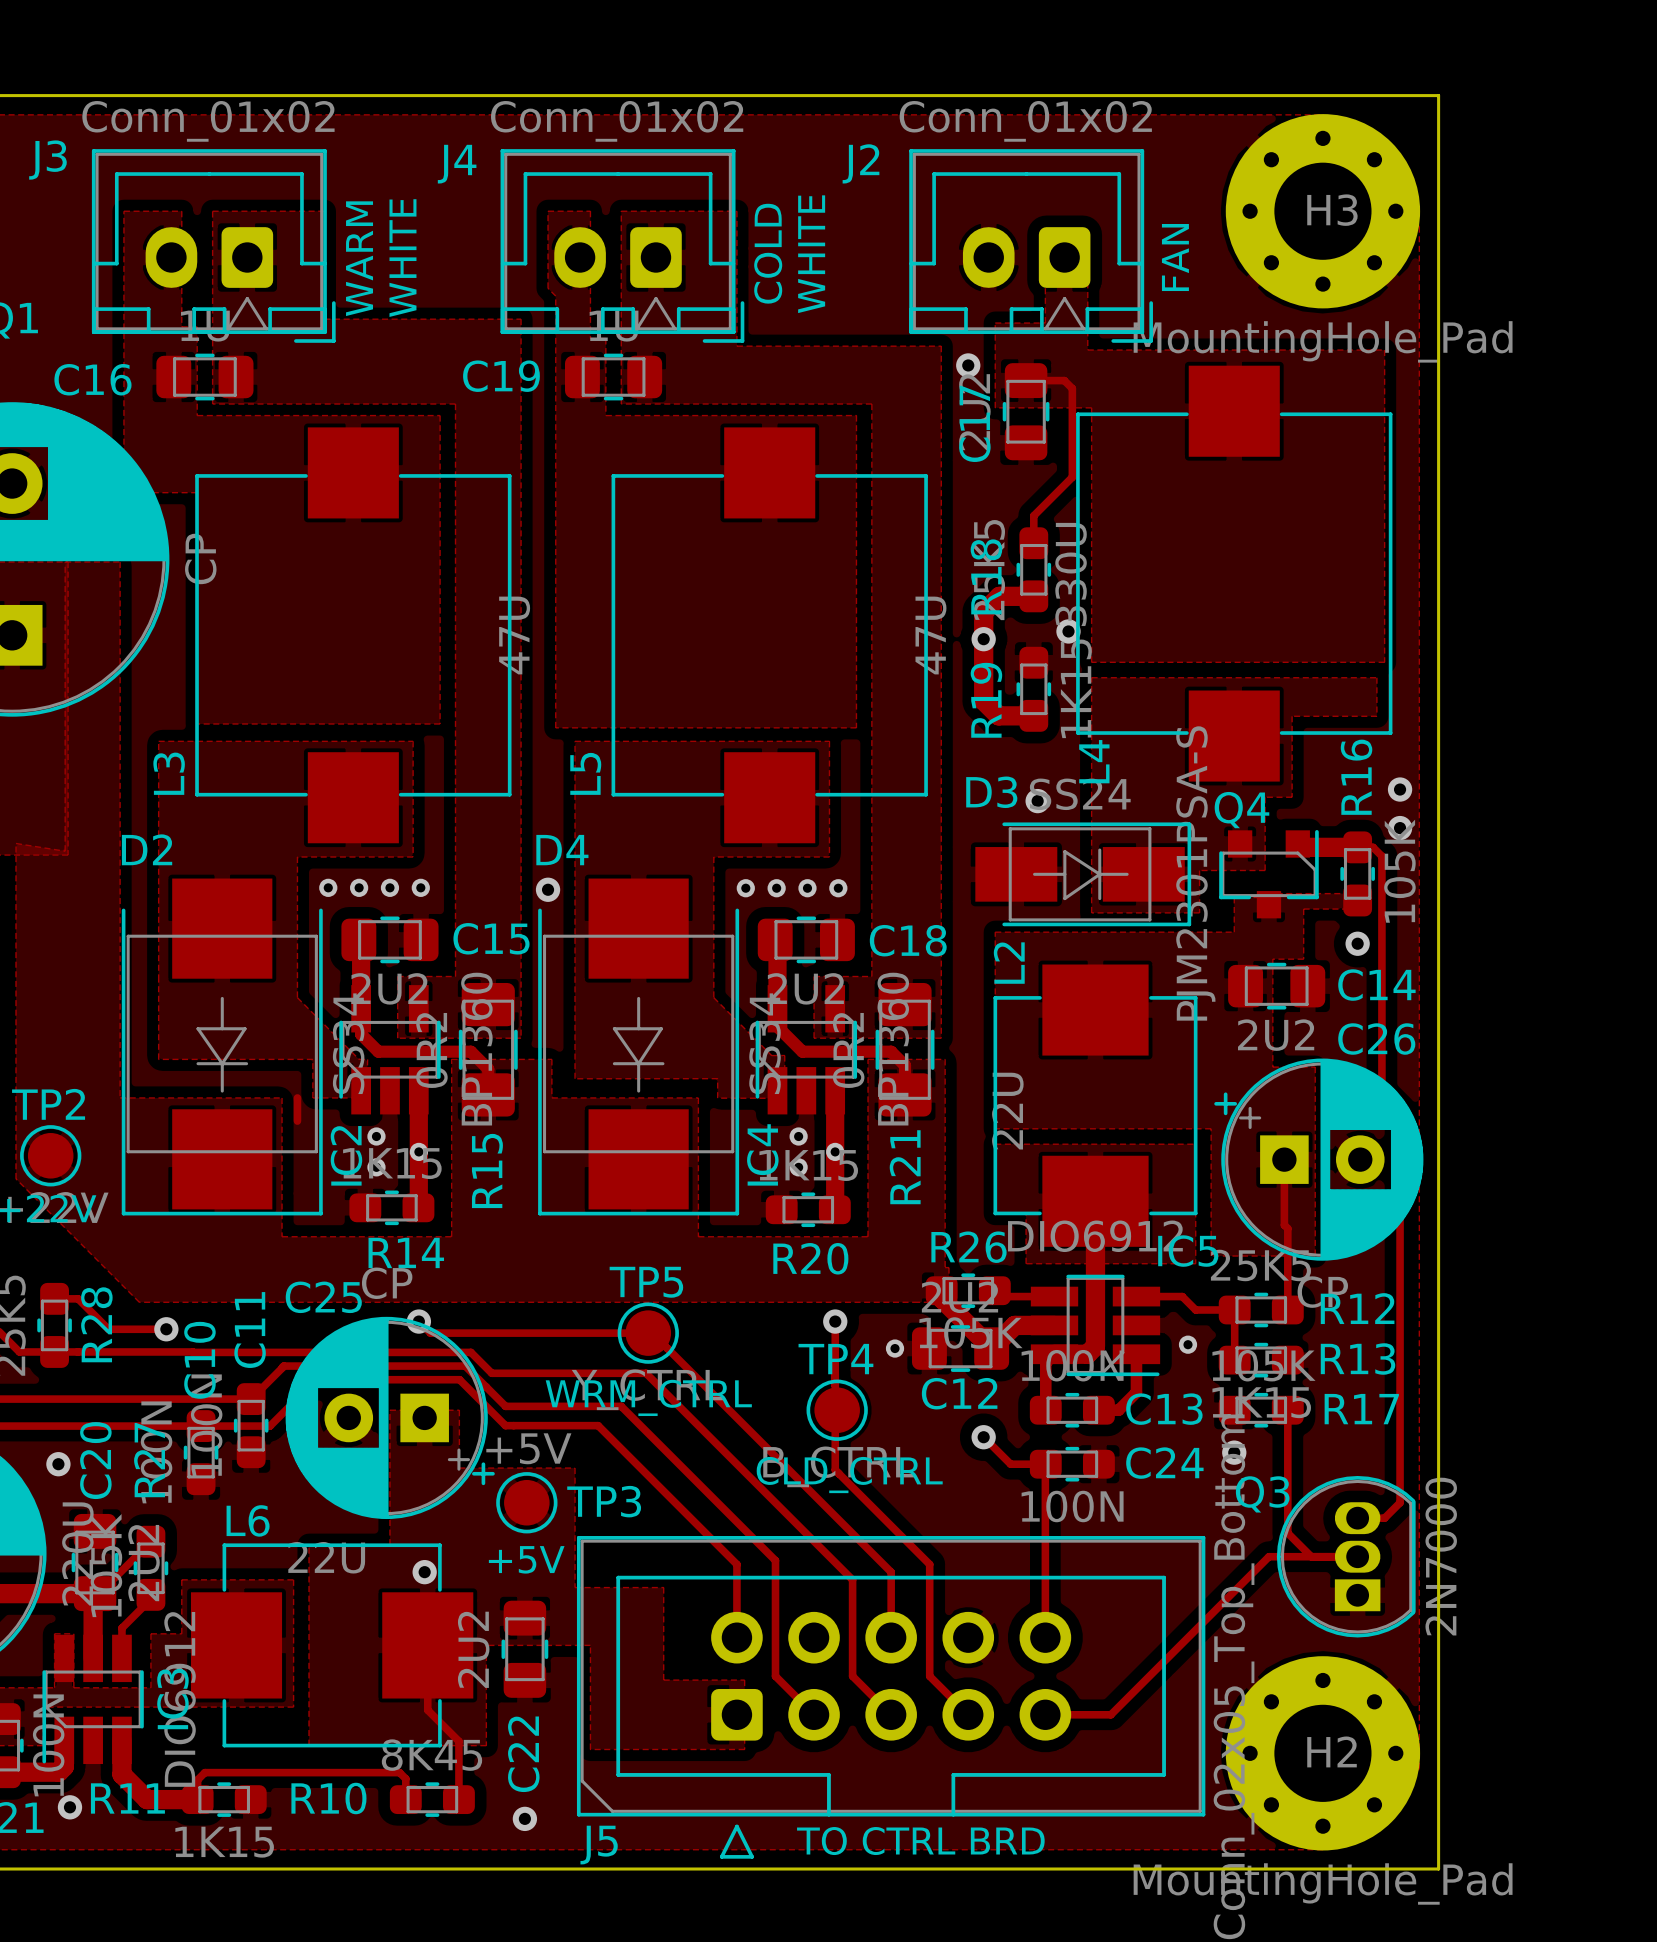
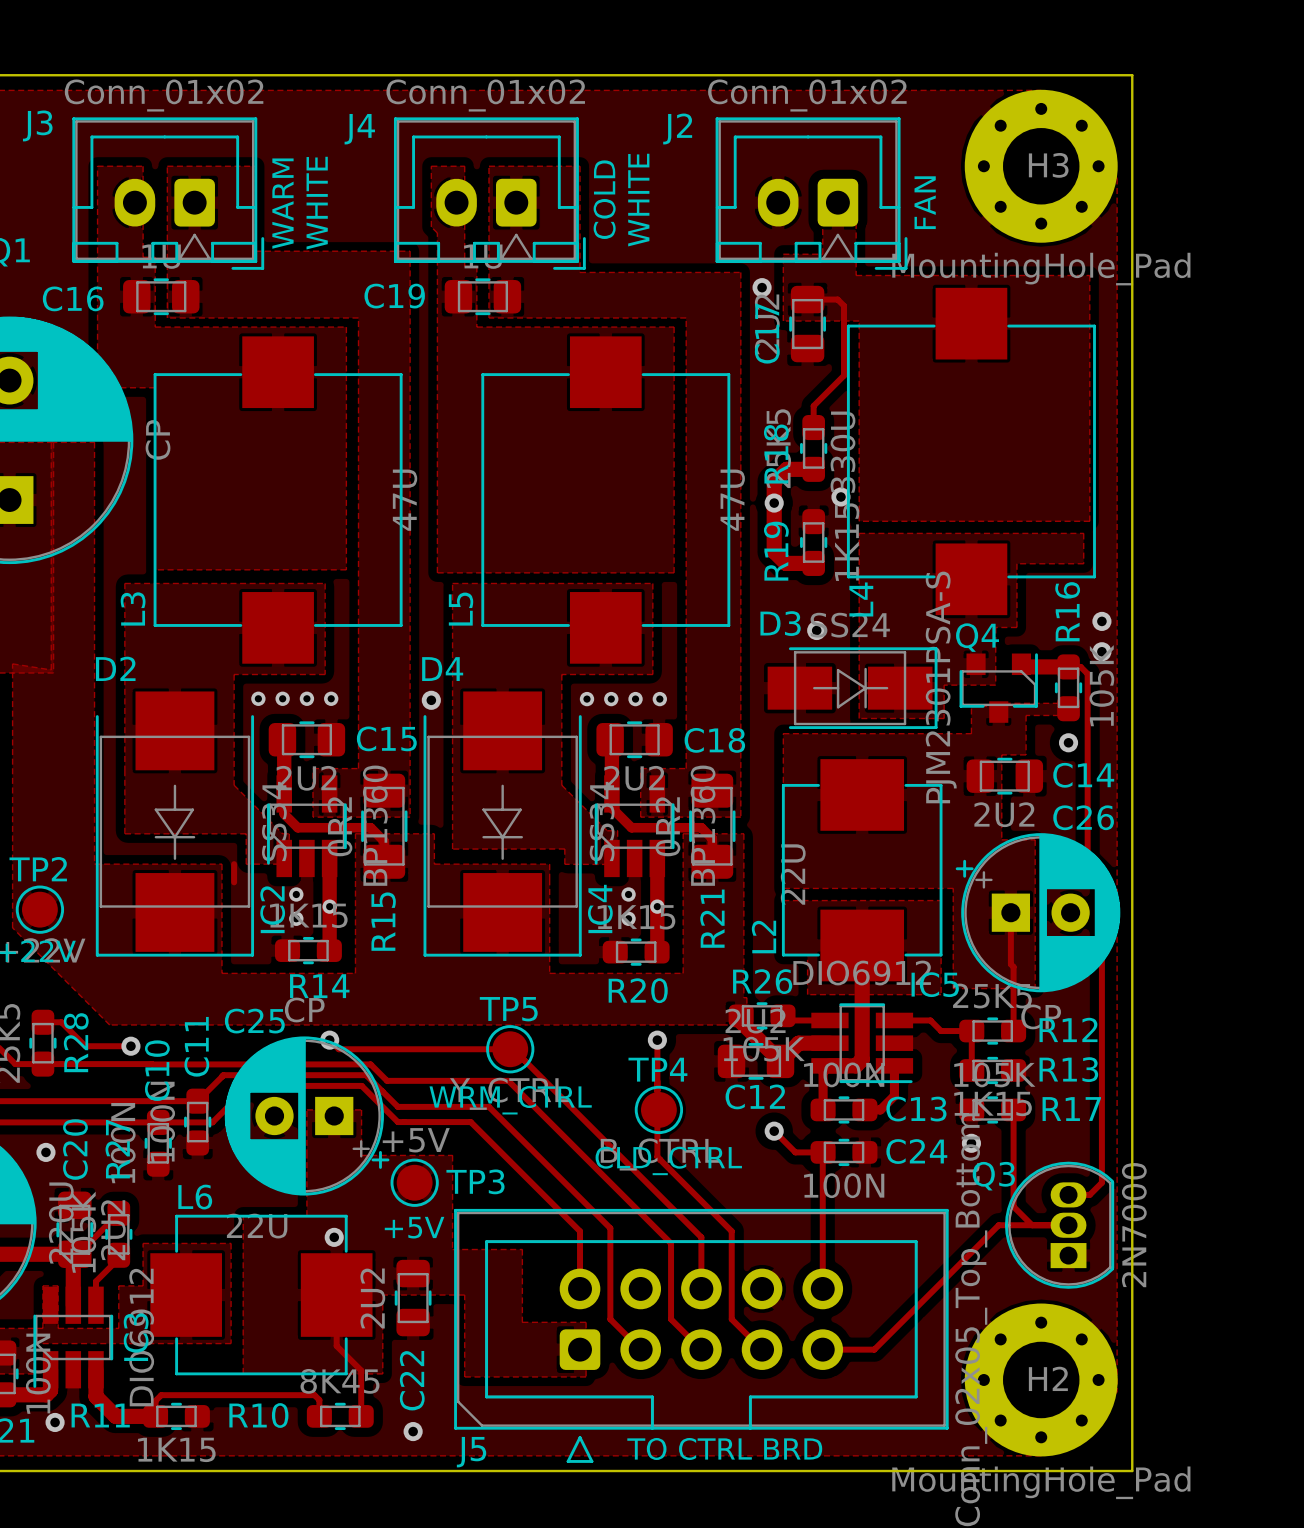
L2 name position: L2 (1009, 963) -> L2 (764, 937)
via: (1188, 1344) -> none
via: (895, 1348) -> none

